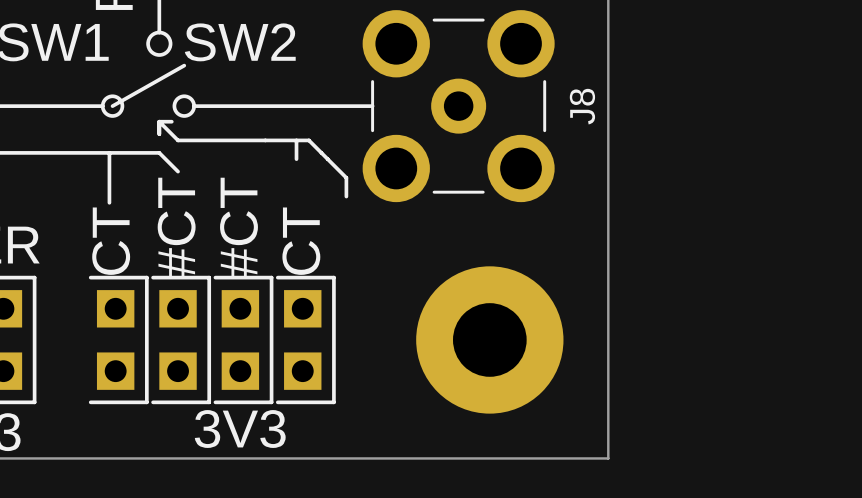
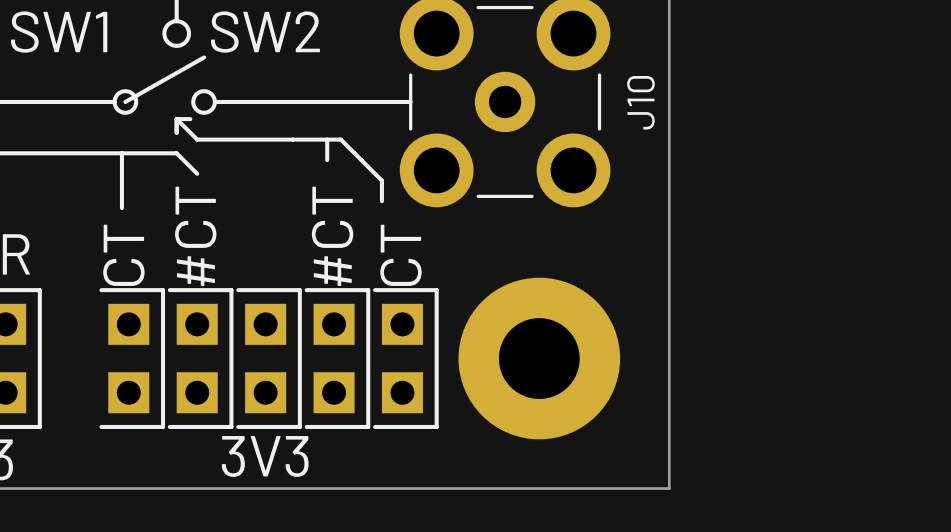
J8 name: J8 (582, 106) -> J10 (640, 102)
text: #CT (239, 227) -> none
text: CT (301, 241) -> #CT (332, 236)
text: none -> CT (400, 255)
part: none -> (405, 358)

